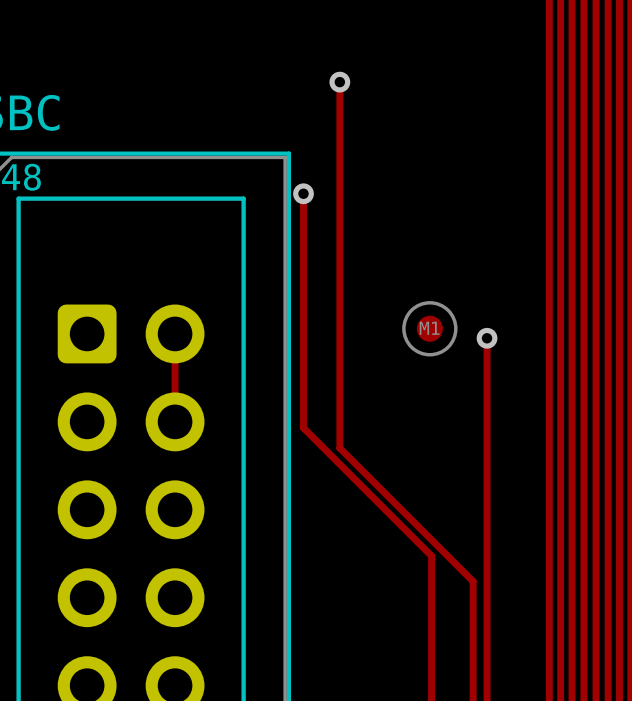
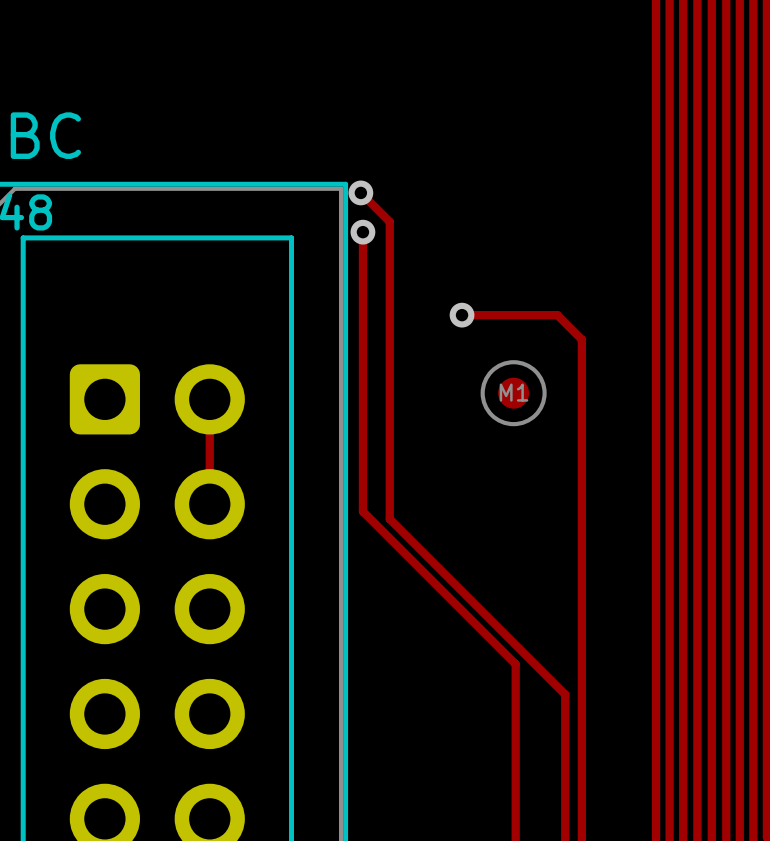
track: (339, 82) (339, 448) -> (360, 192) (389, 221) (389, 519) (406, 535)
via position: (339, 82) -> (360, 192)
track: none -> (462, 315) (557, 315) (581, 339) (581, 404)
via: none -> (462, 315)
via: (487, 338) -> none

